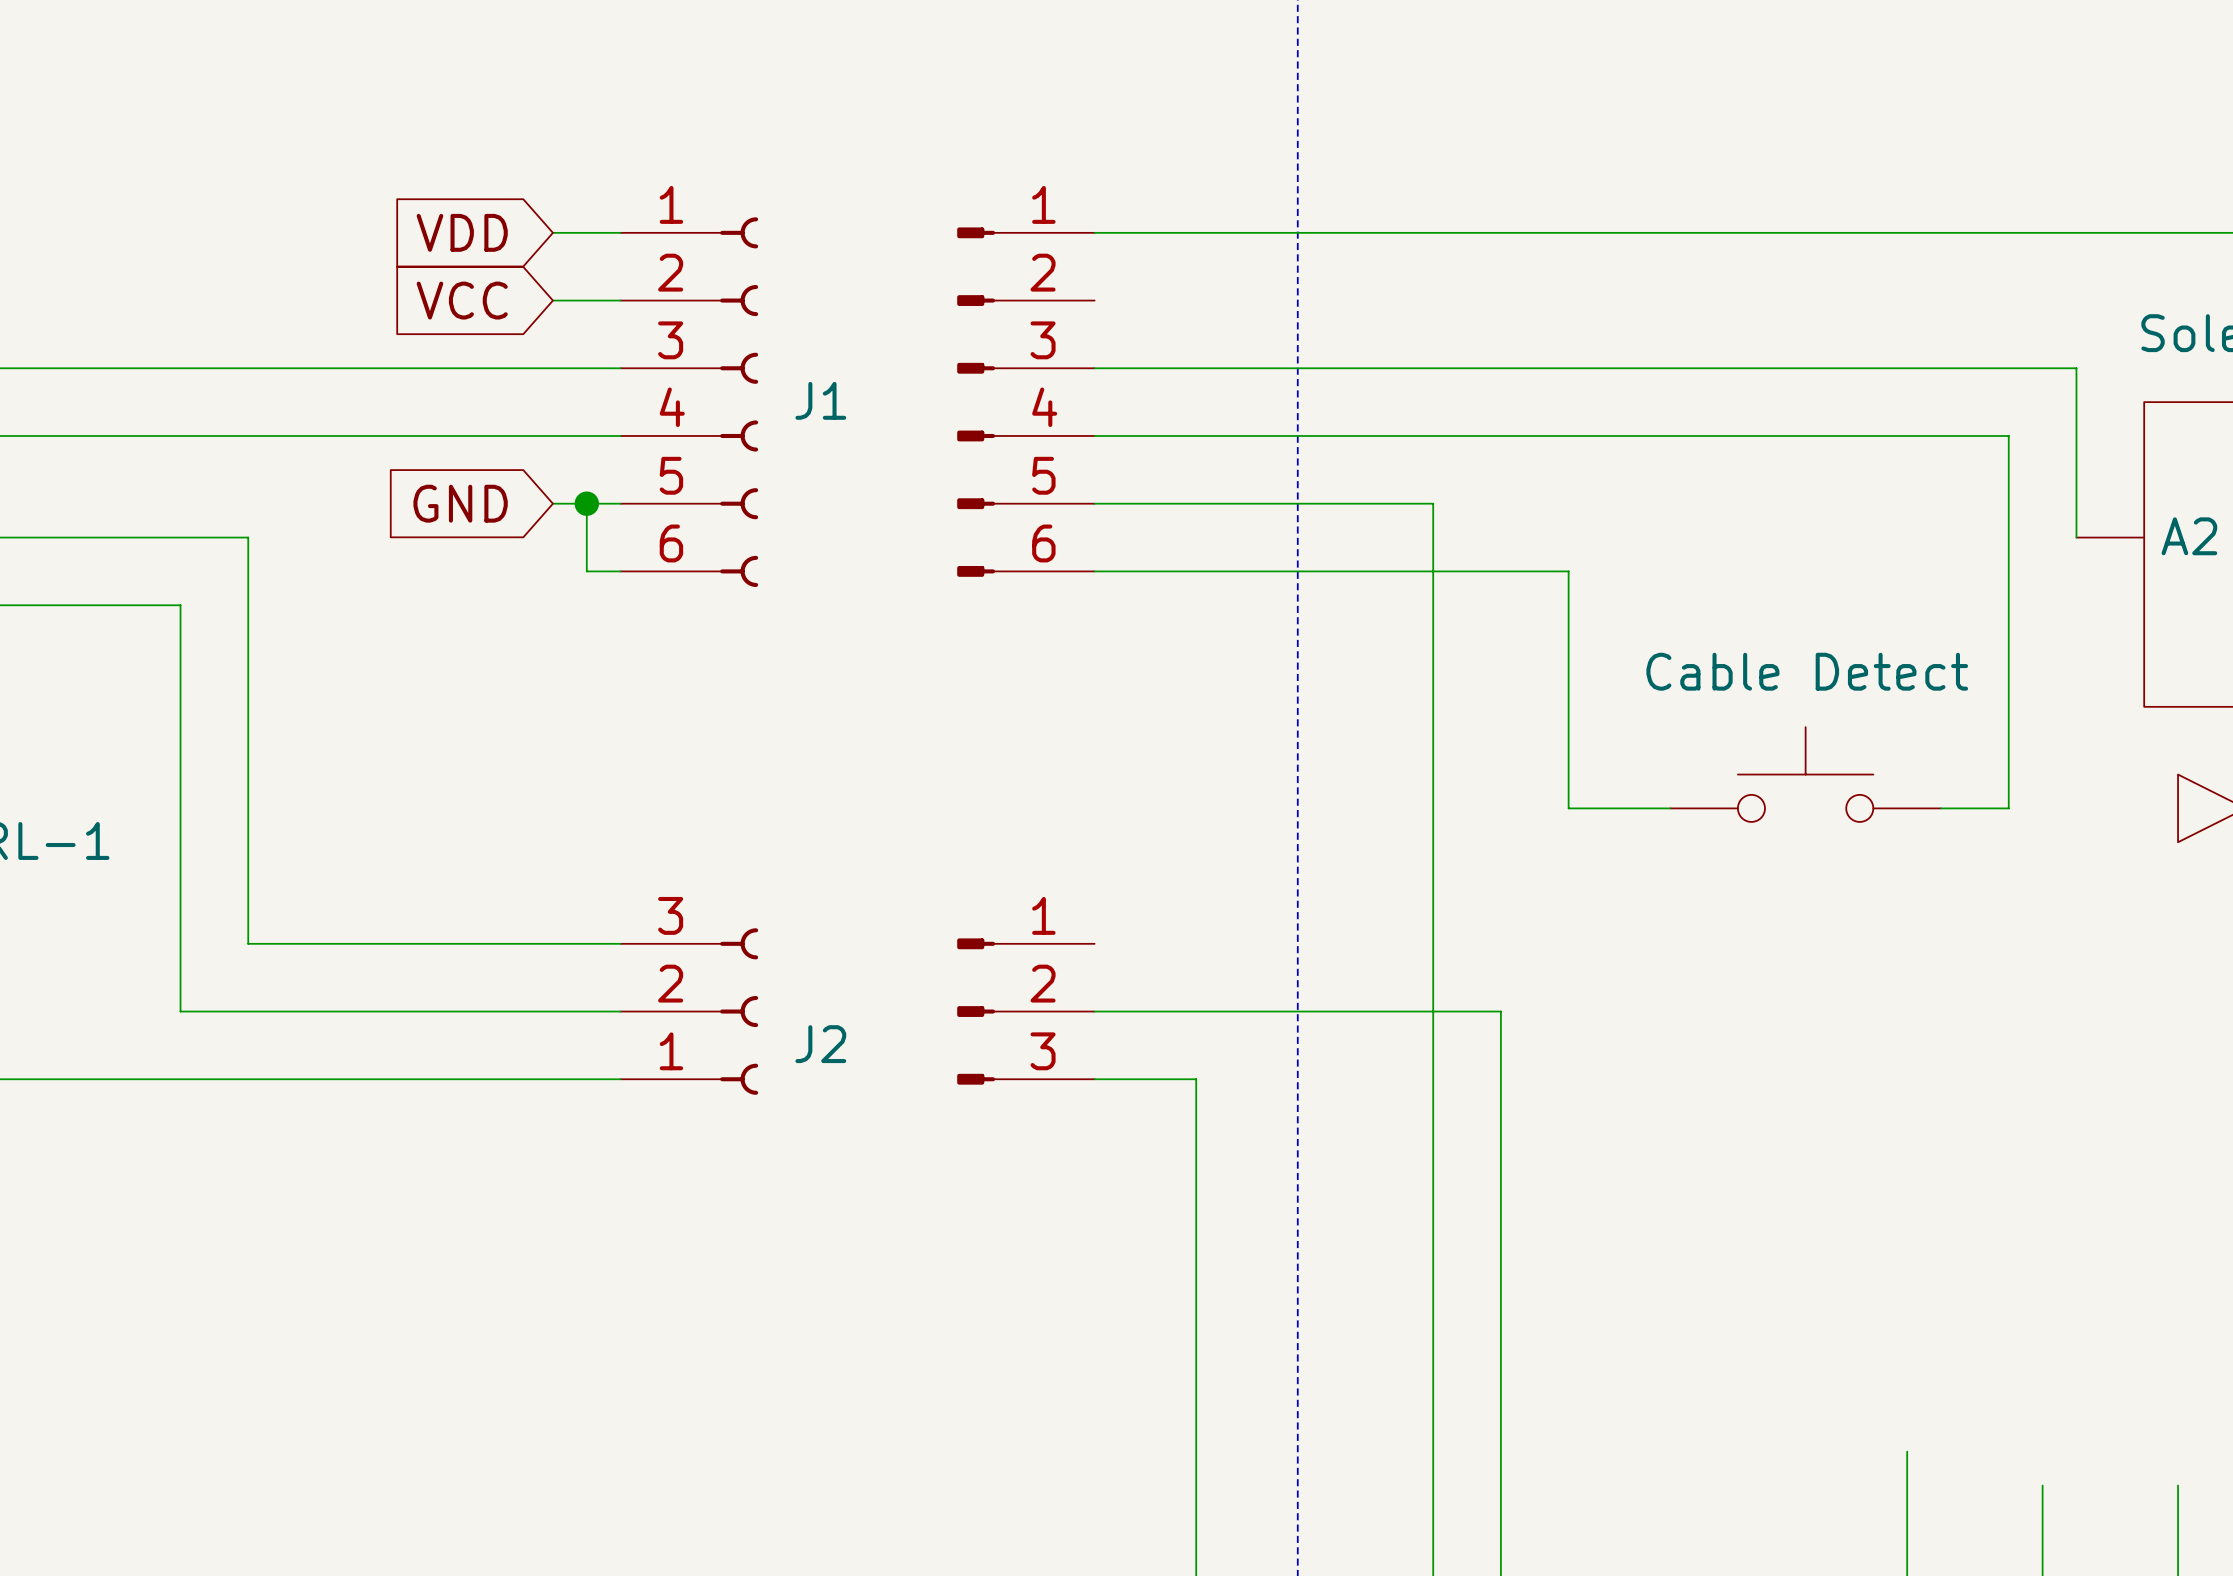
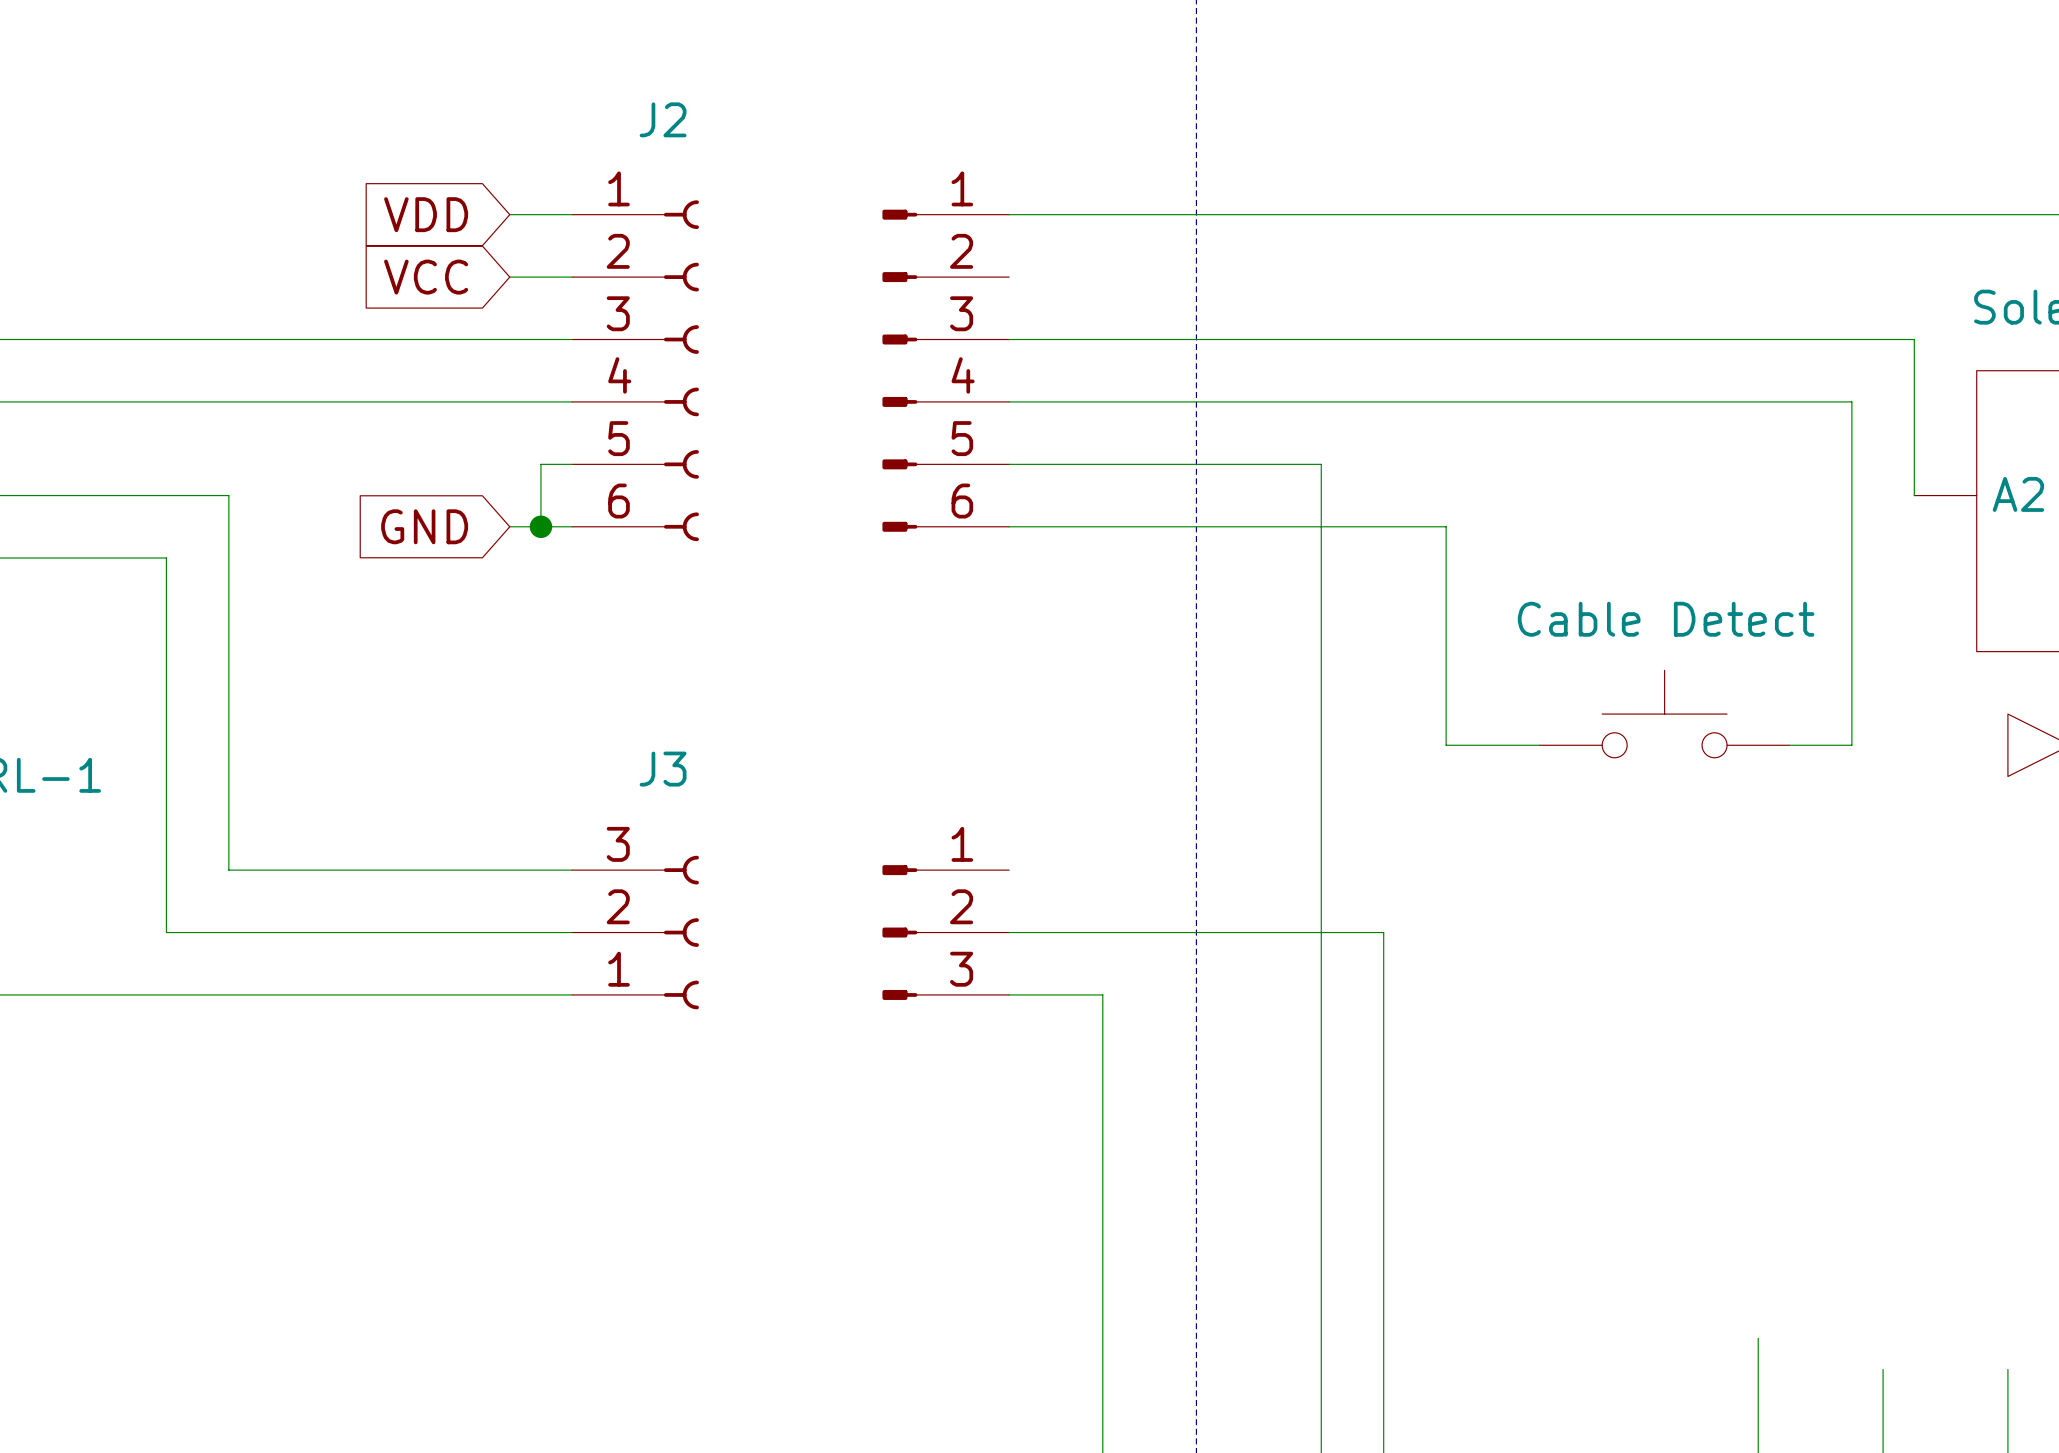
J1 name: J1 (820, 400) -> J2 (663, 119)
global label position: GND (460, 503) -> GND (424, 526)
wire: (552, 503) (586, 503) -> (509, 526) (540, 526)
junction position: (586, 503) -> (540, 526)
J2 name: J2 (820, 1044) -> J3 (663, 769)

